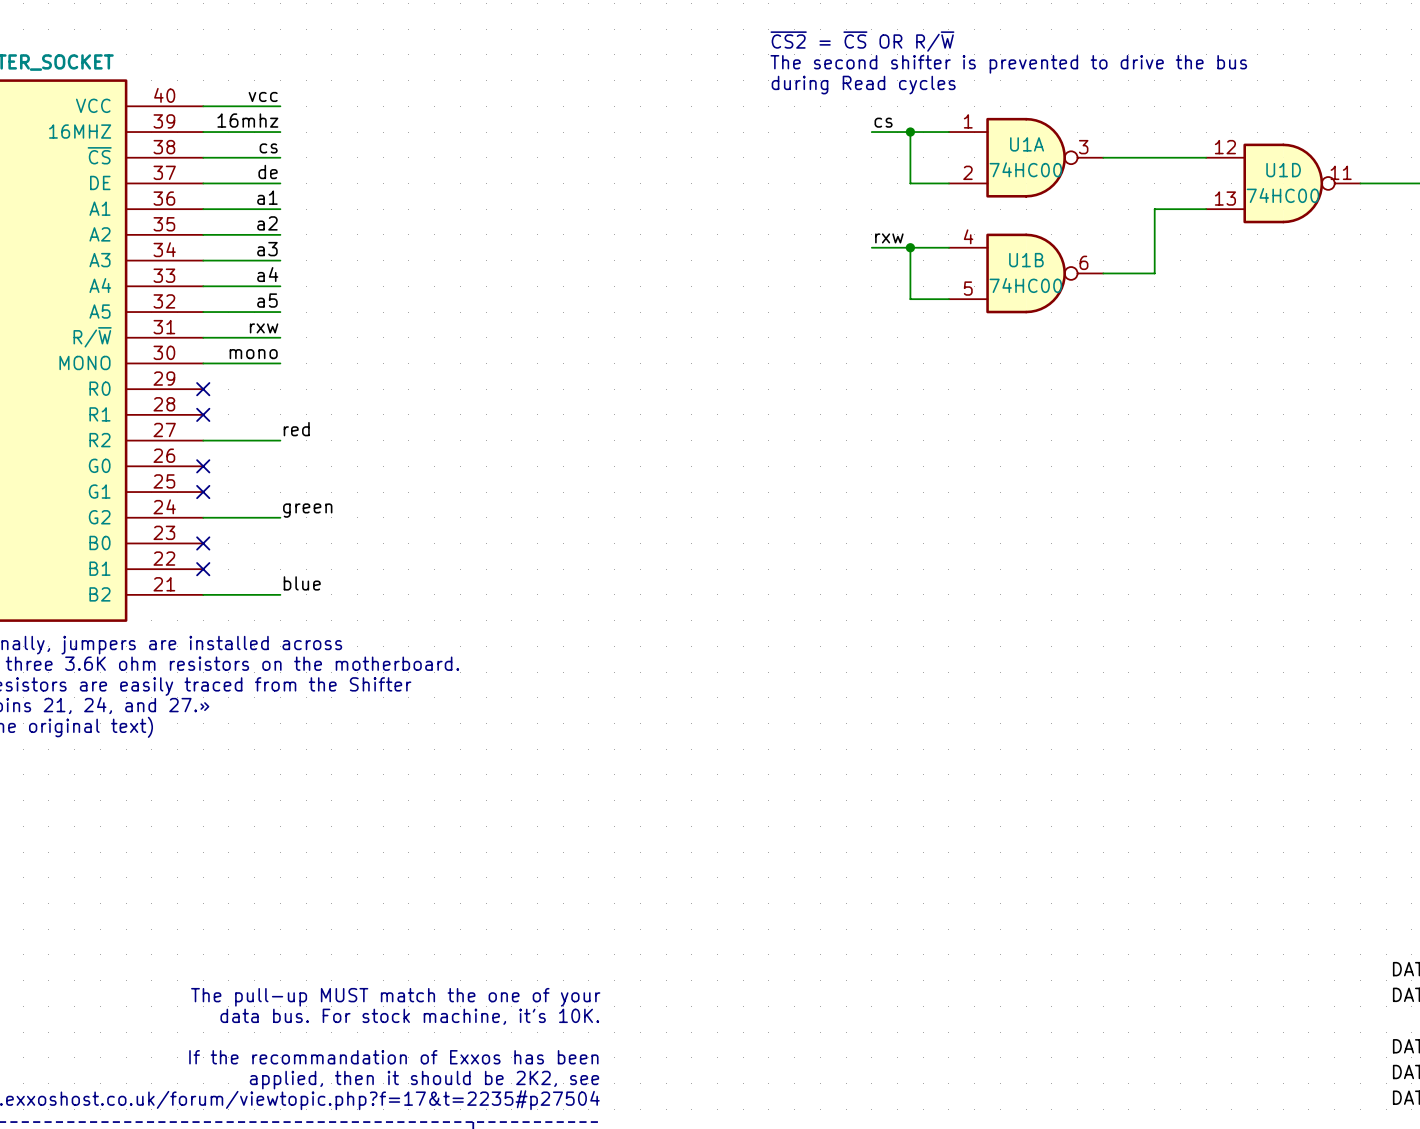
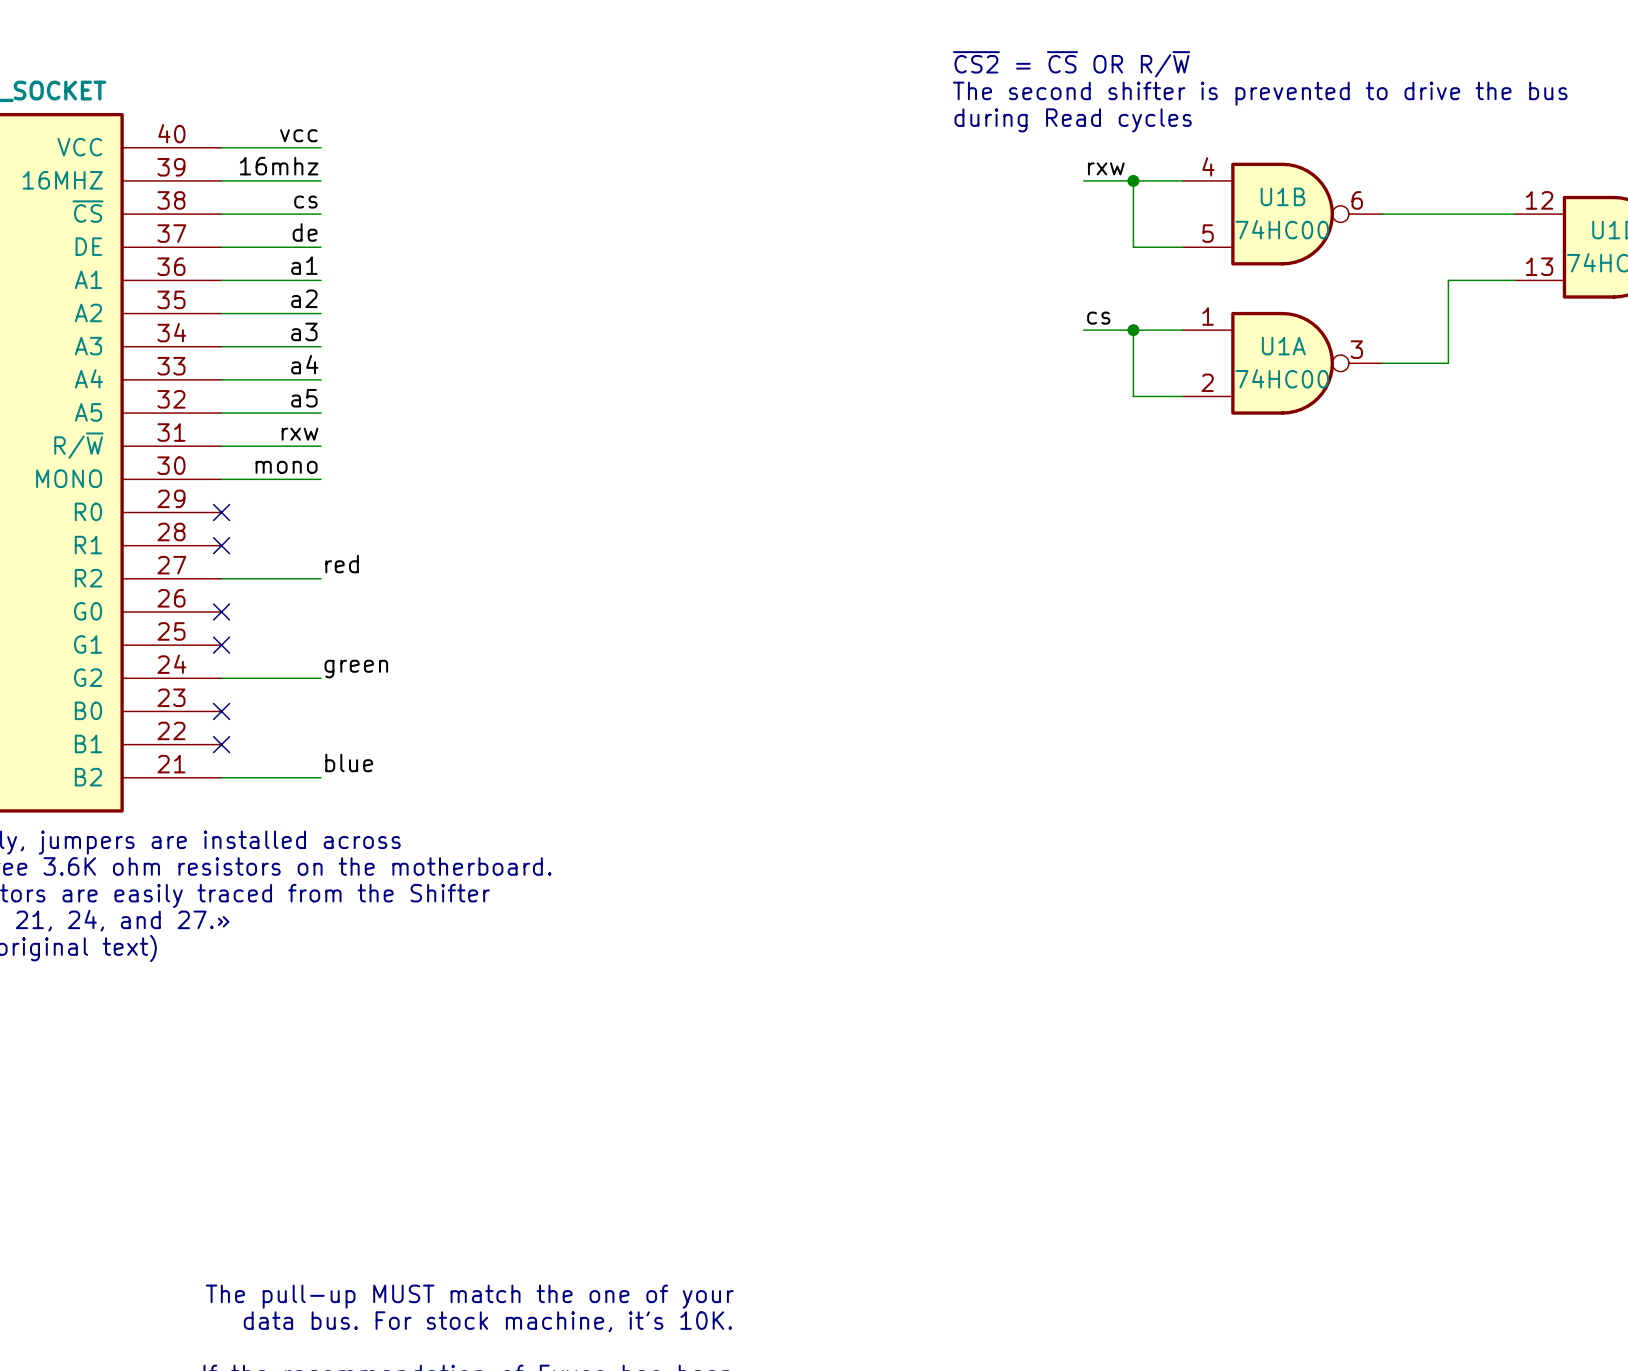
label: cs (883, 122) -> rxw (1106, 168)
U1A position: (1026, 157) -> (1282, 363)
label: rxw (889, 238) -> cs (1098, 318)
U1B position: (1026, 273) -> (1282, 214)

